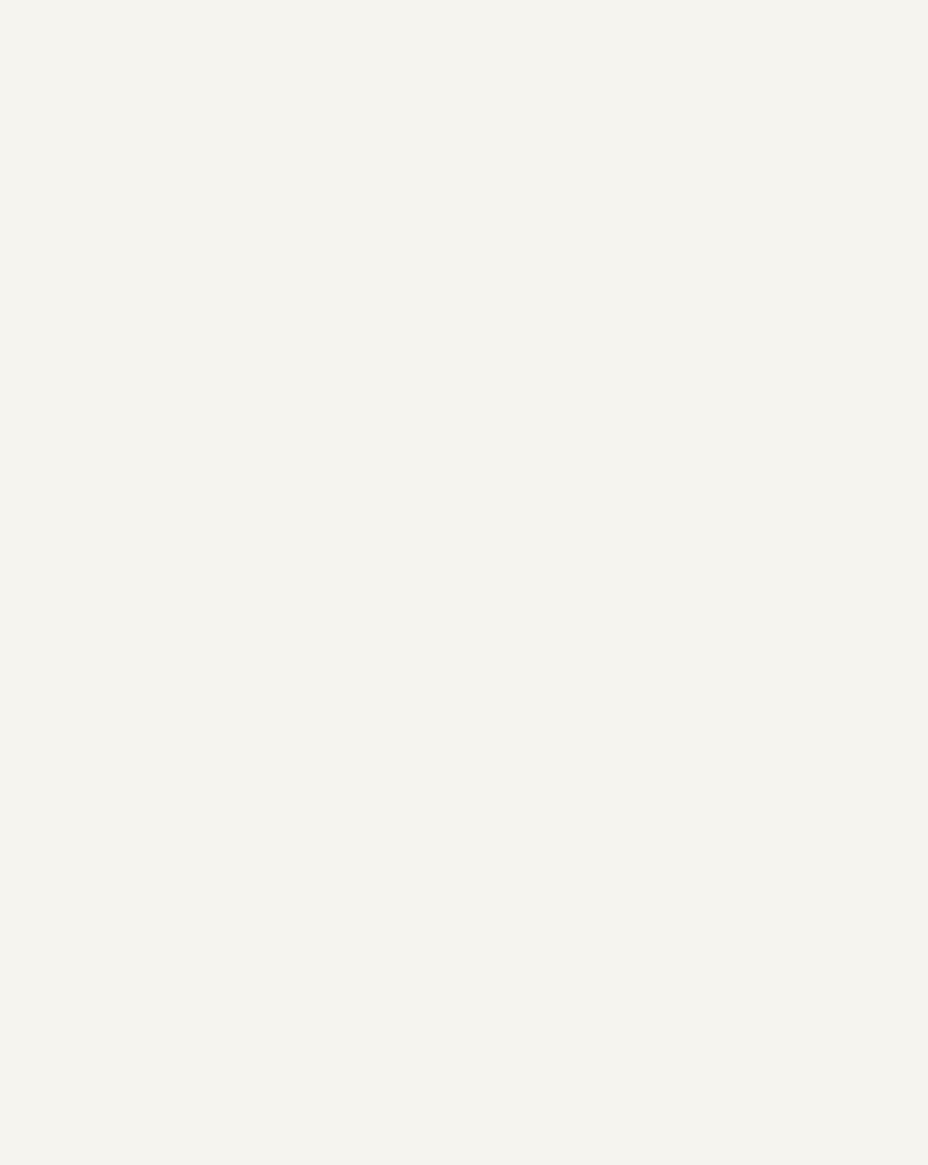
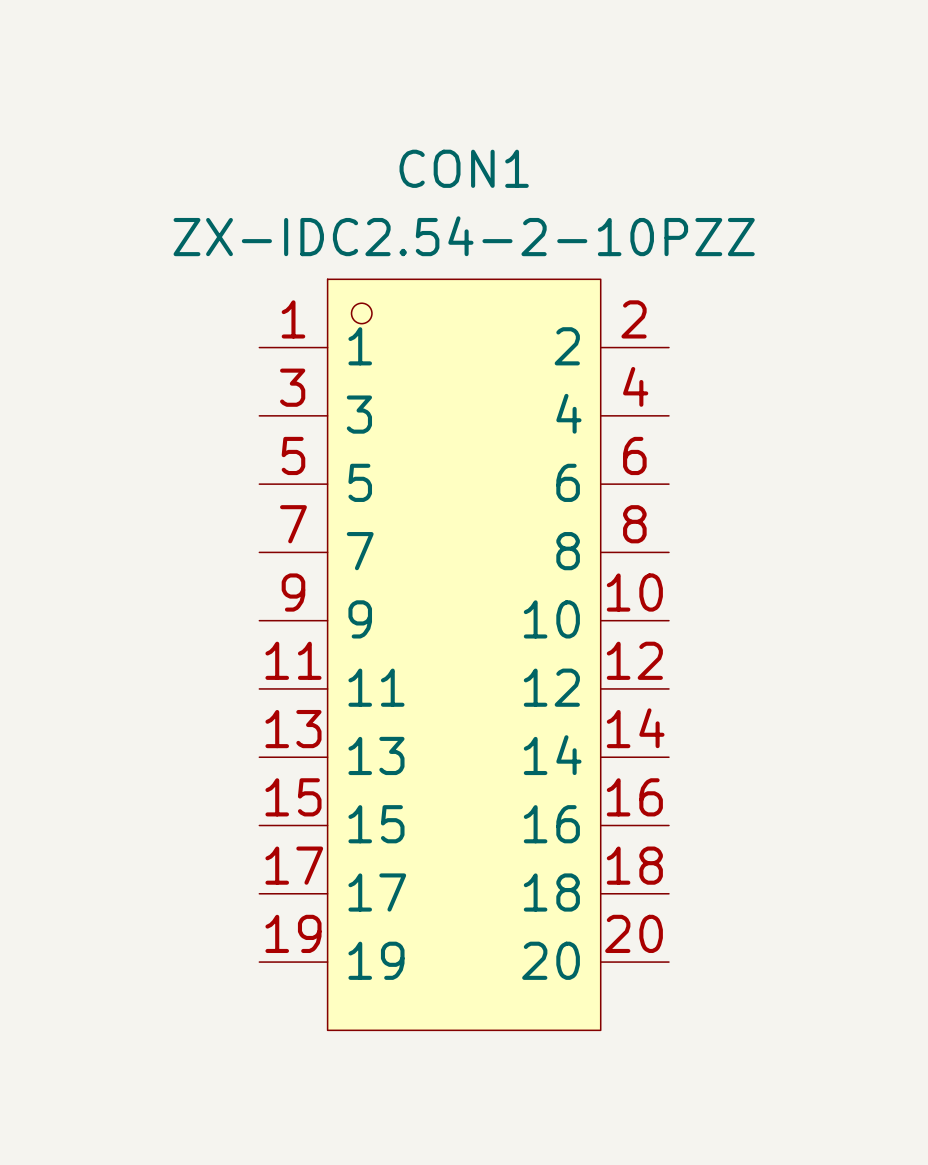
CON1: none -> ZX-IDC2.54-2-10PZZ (464, 654)

